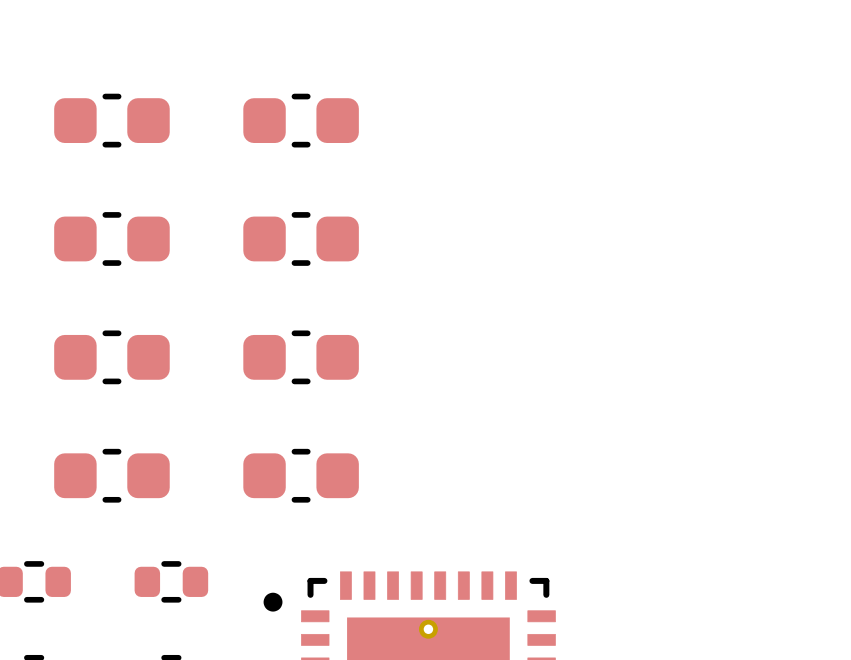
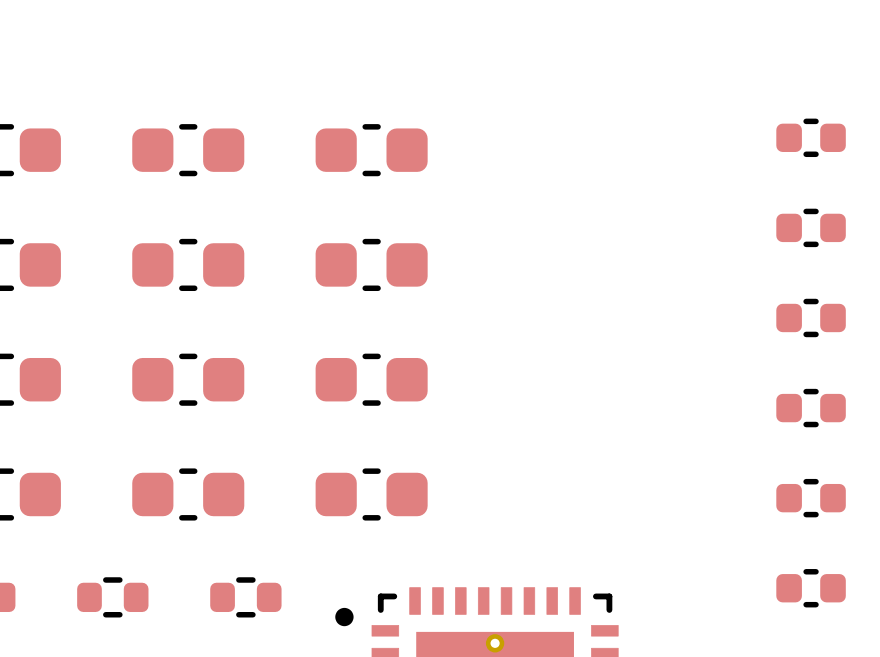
part: none -> (811, 137)
part: none -> (811, 227)
part: none -> (811, 317)
part: none -> (811, 408)
part: none -> (811, 498)
part: none -> (811, 588)

